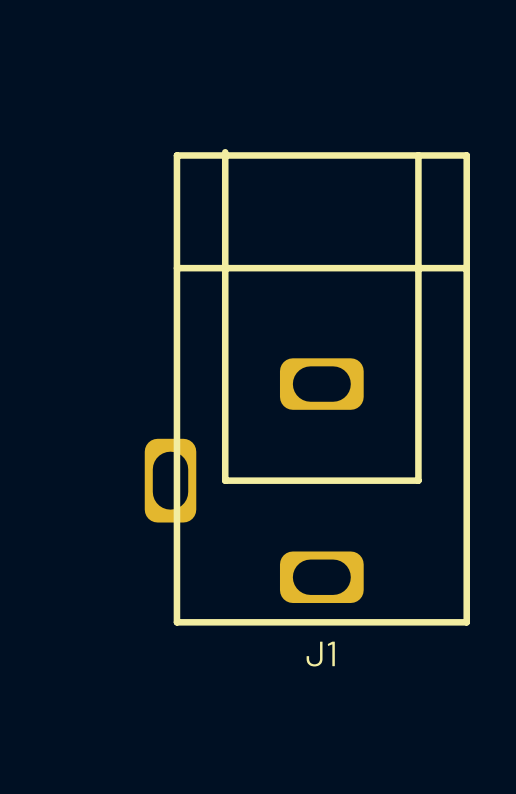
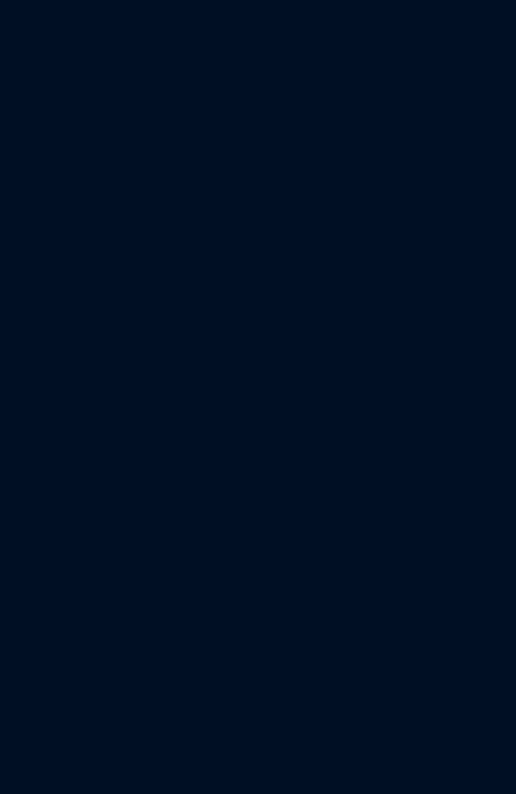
J1: (307, 387) -> none

